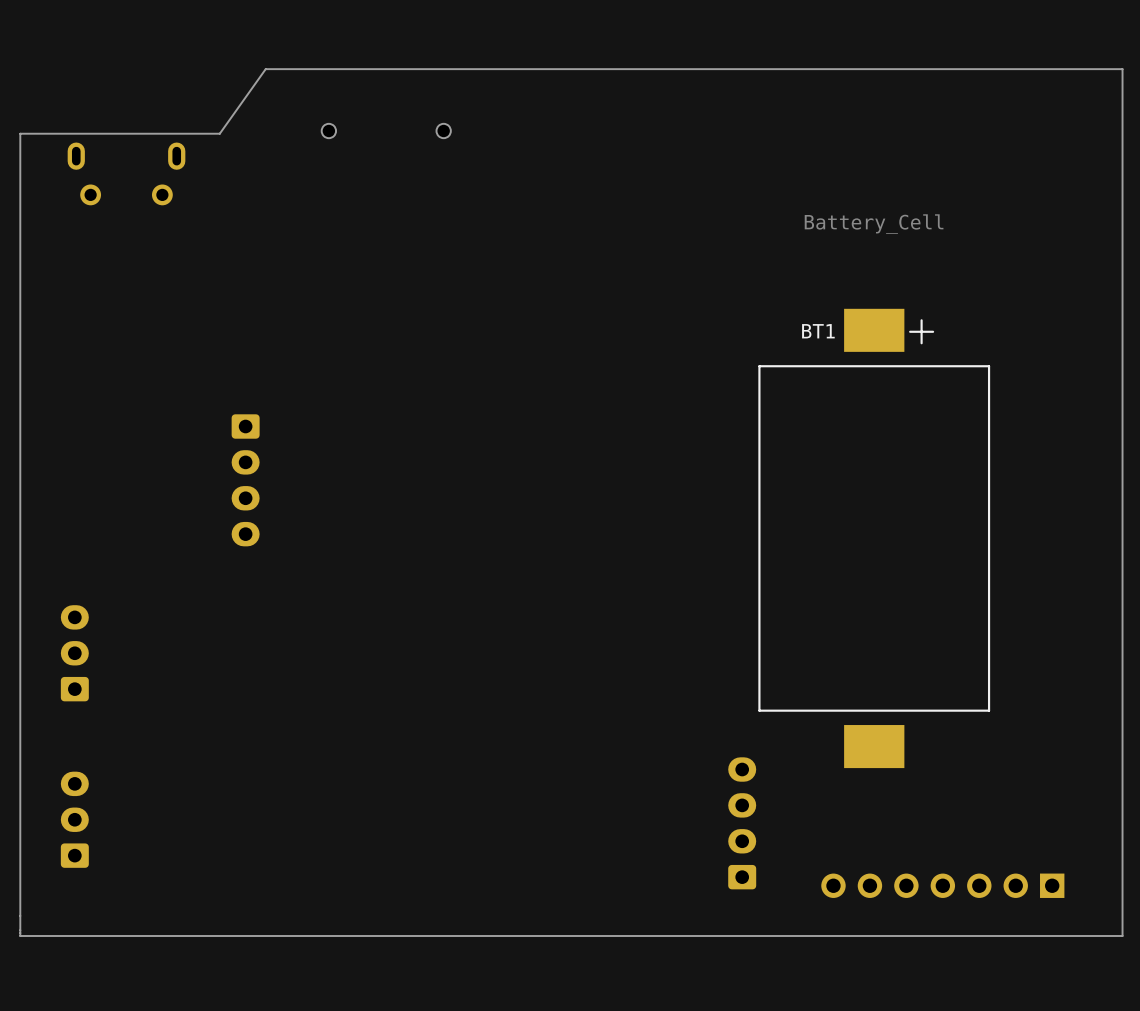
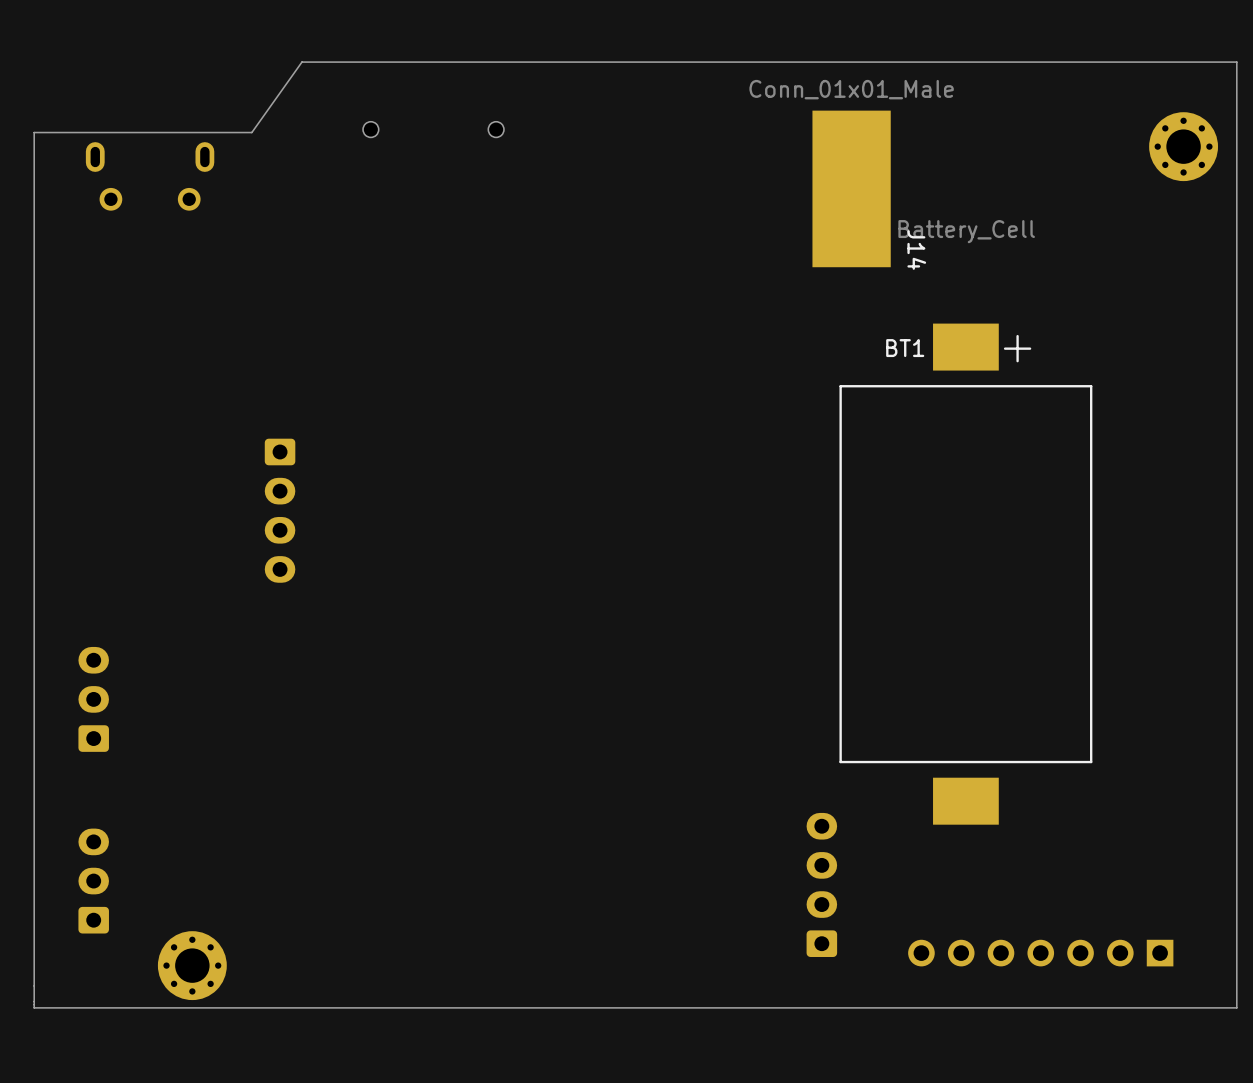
part: none -> (1183, 146)
J14: none -> Conn_01x01_Male (851, 188)
part: none -> (192, 965)

